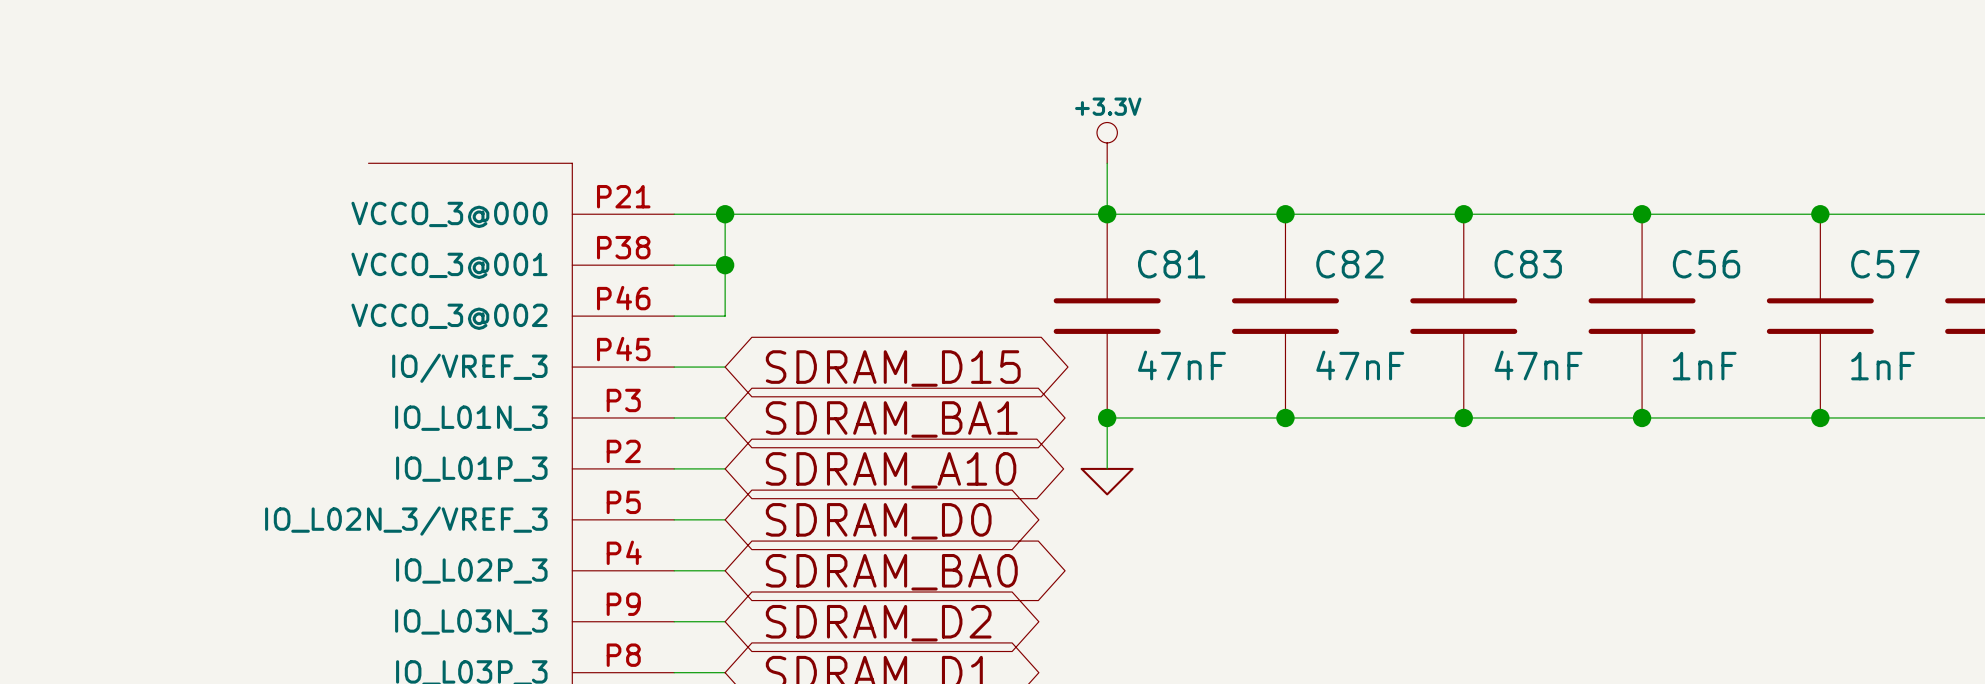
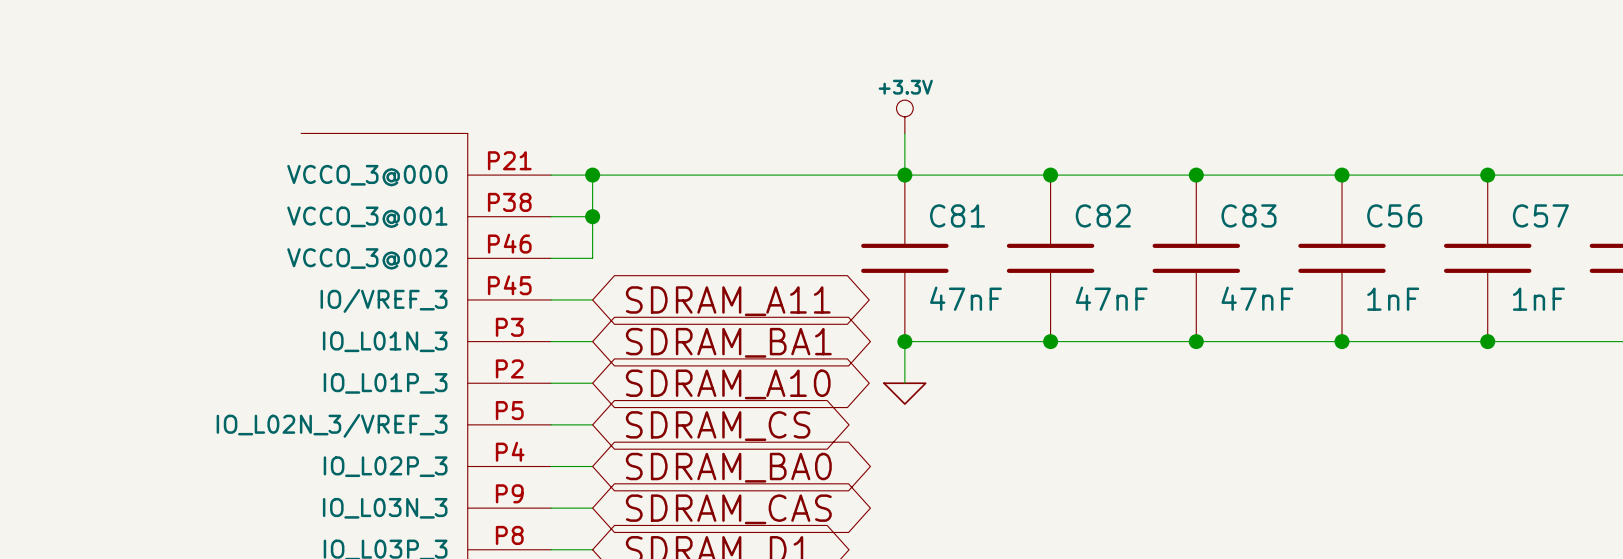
global label: SDRAM_D15 (893, 368) -> SDRAM_A11 (728, 301)
global label: SDRAM_D0 (878, 521) -> SDRAM_CS (718, 426)
global label: SDRAM_D2 (878, 623) -> SDRAM_CAS (728, 509)

